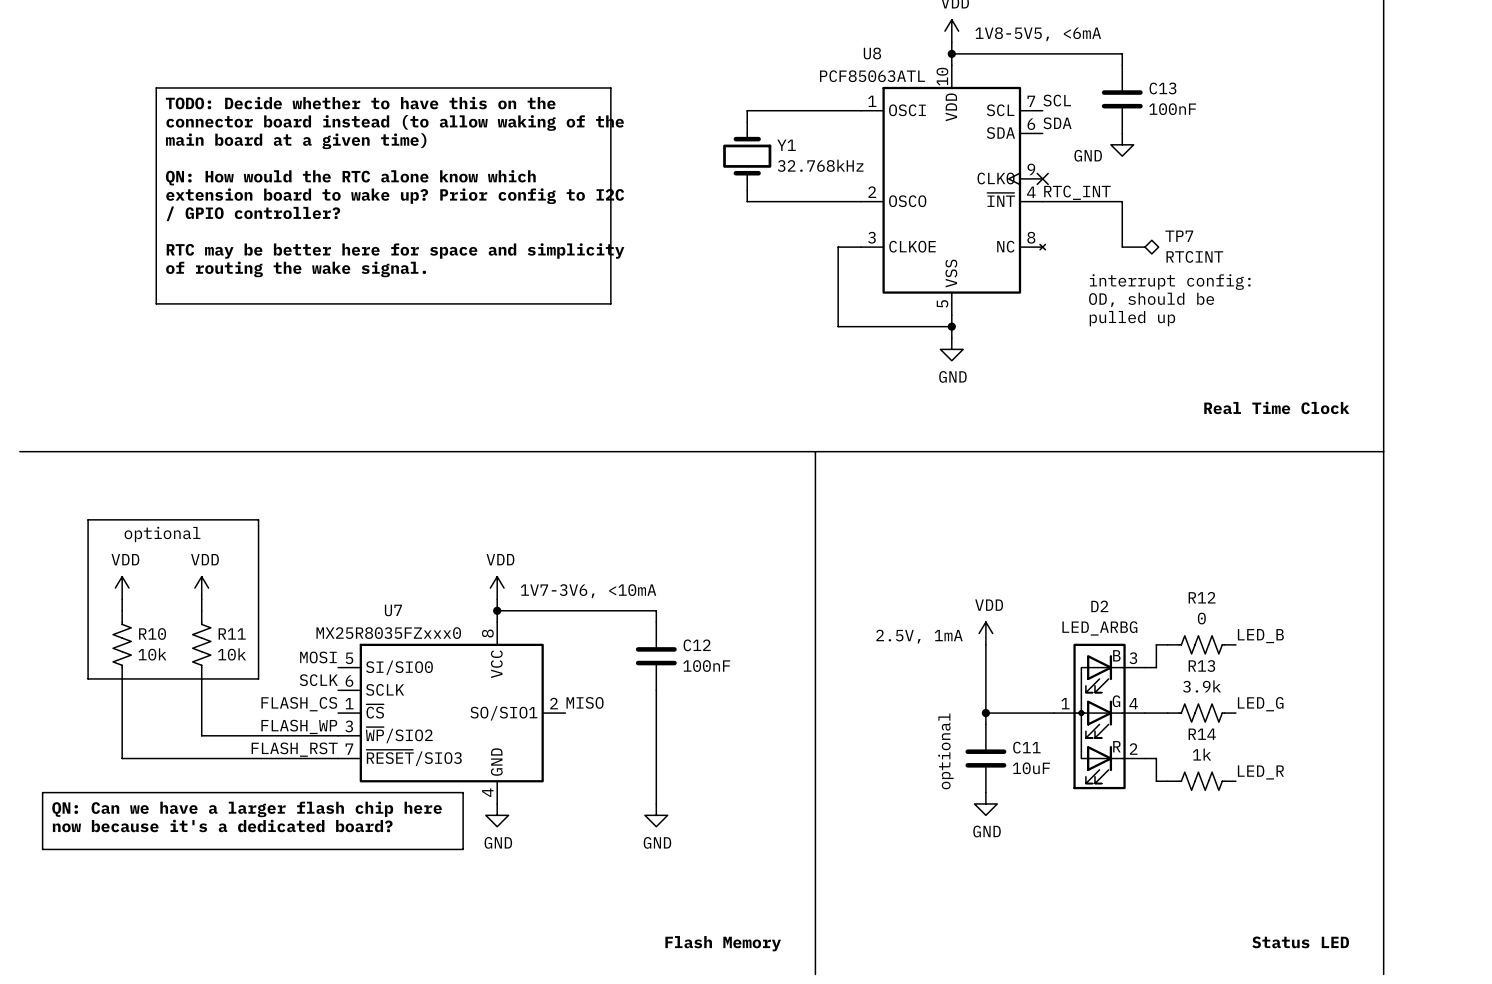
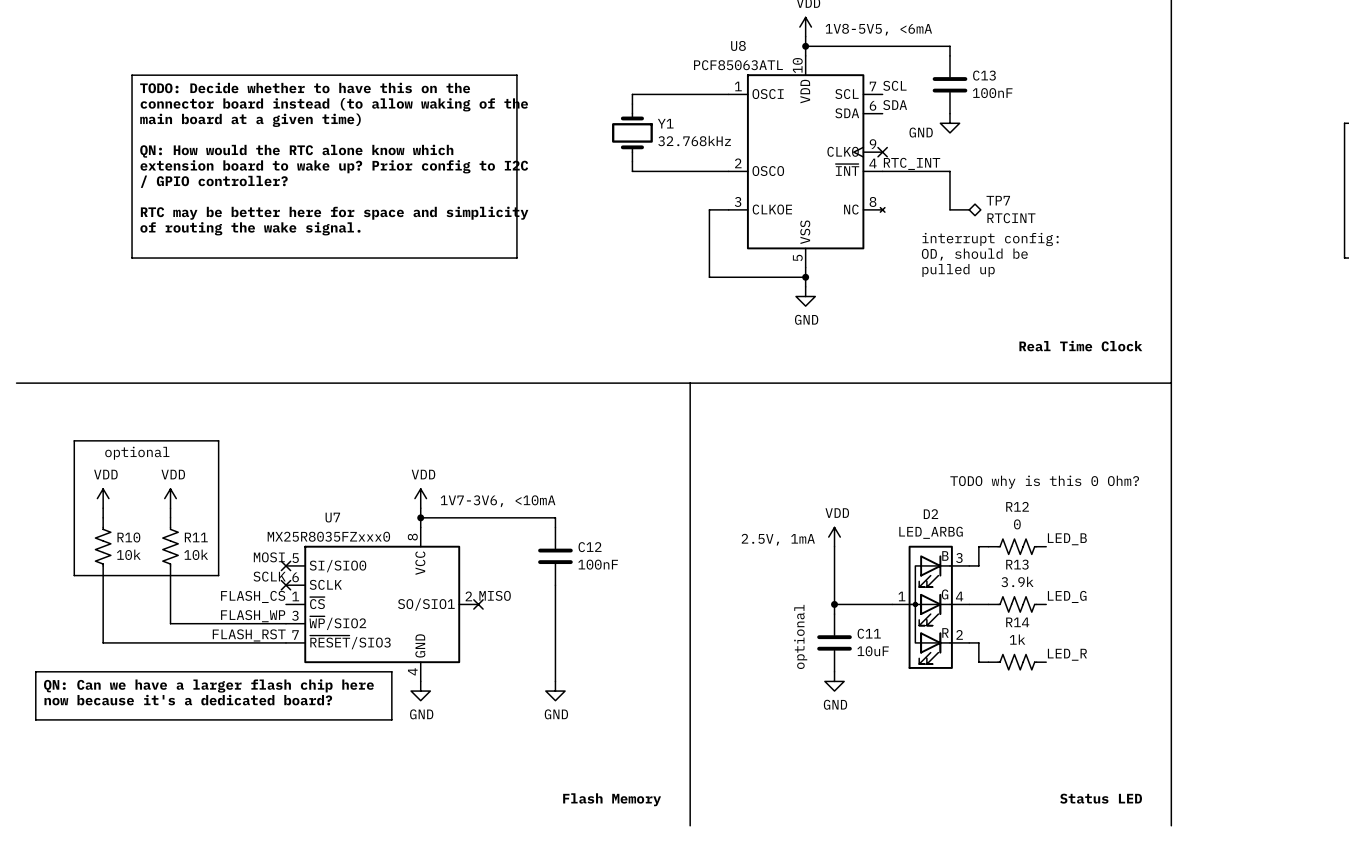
text: none -> TODO why is this 0 Ohm? (1044, 482)
no-connect mark: none -> (285, 565)
no-connect mark: none -> (285, 585)
no-connect mark: none -> (478, 604)

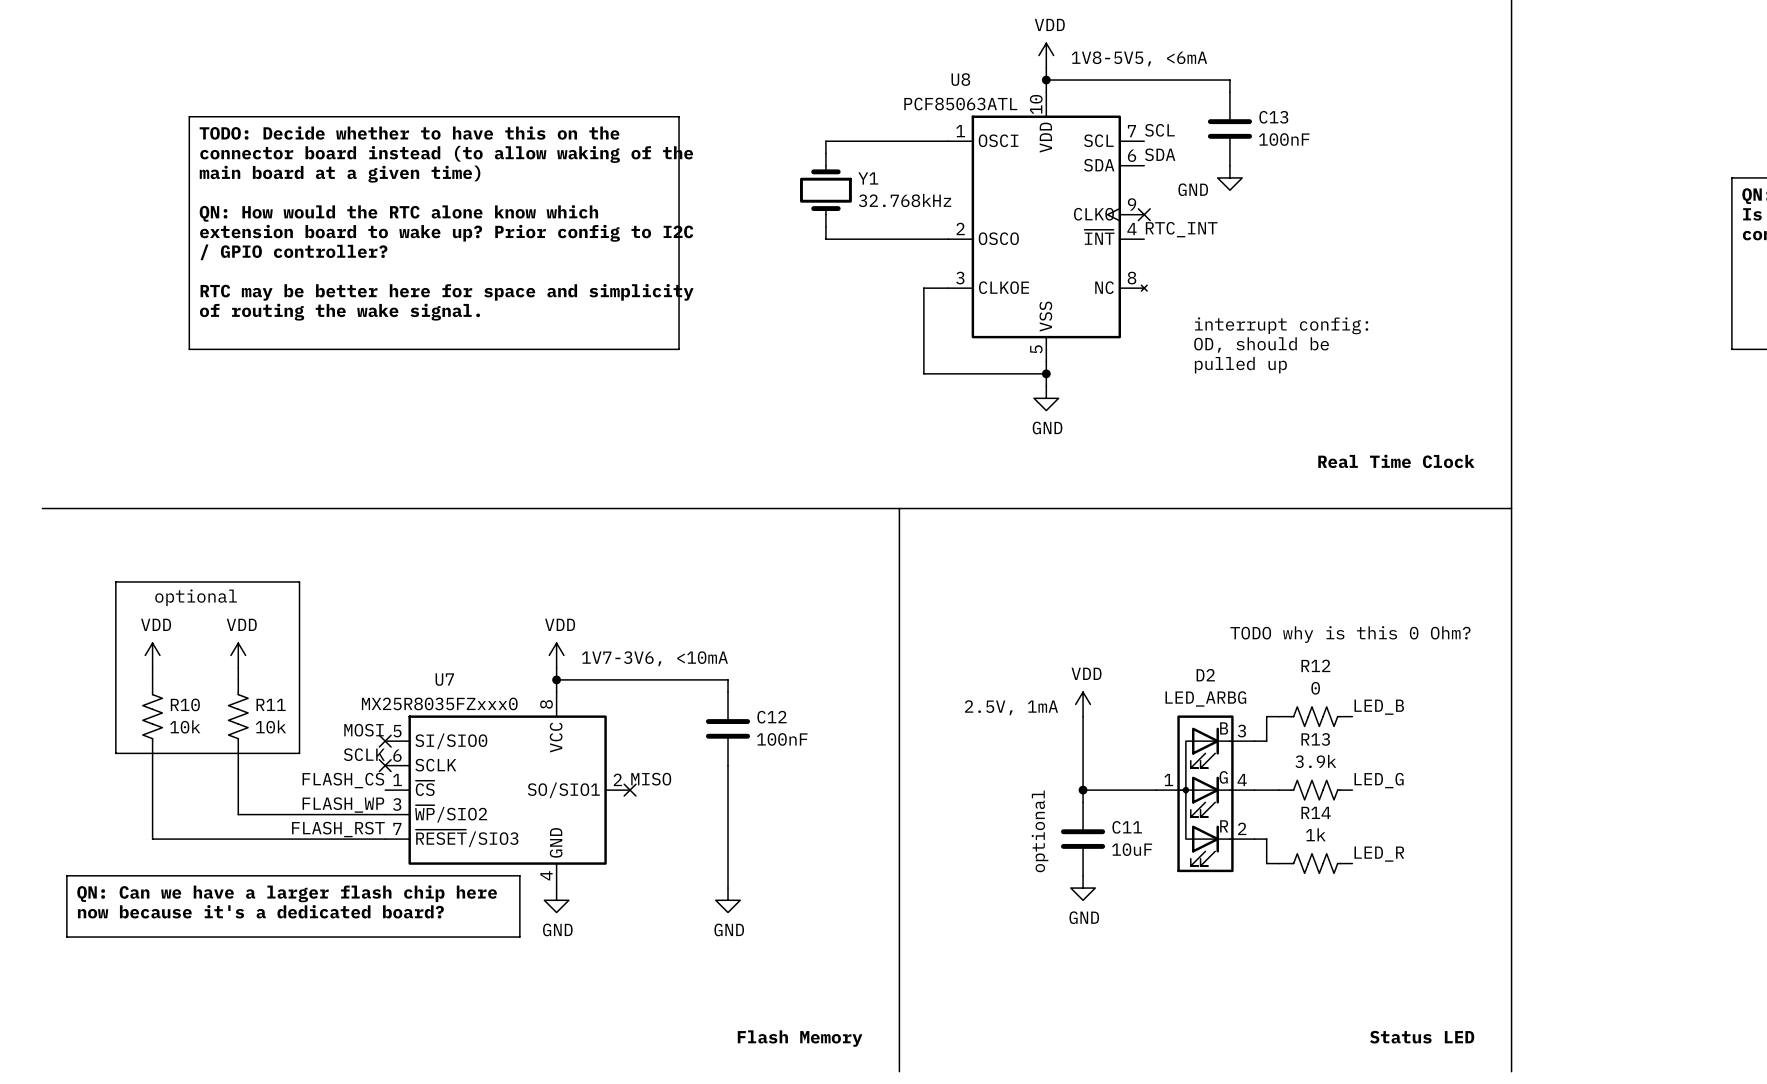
wire: (882, 171) (949, 171) (949, 209) -> none
TP7: RTCINT (965, 209) -> none

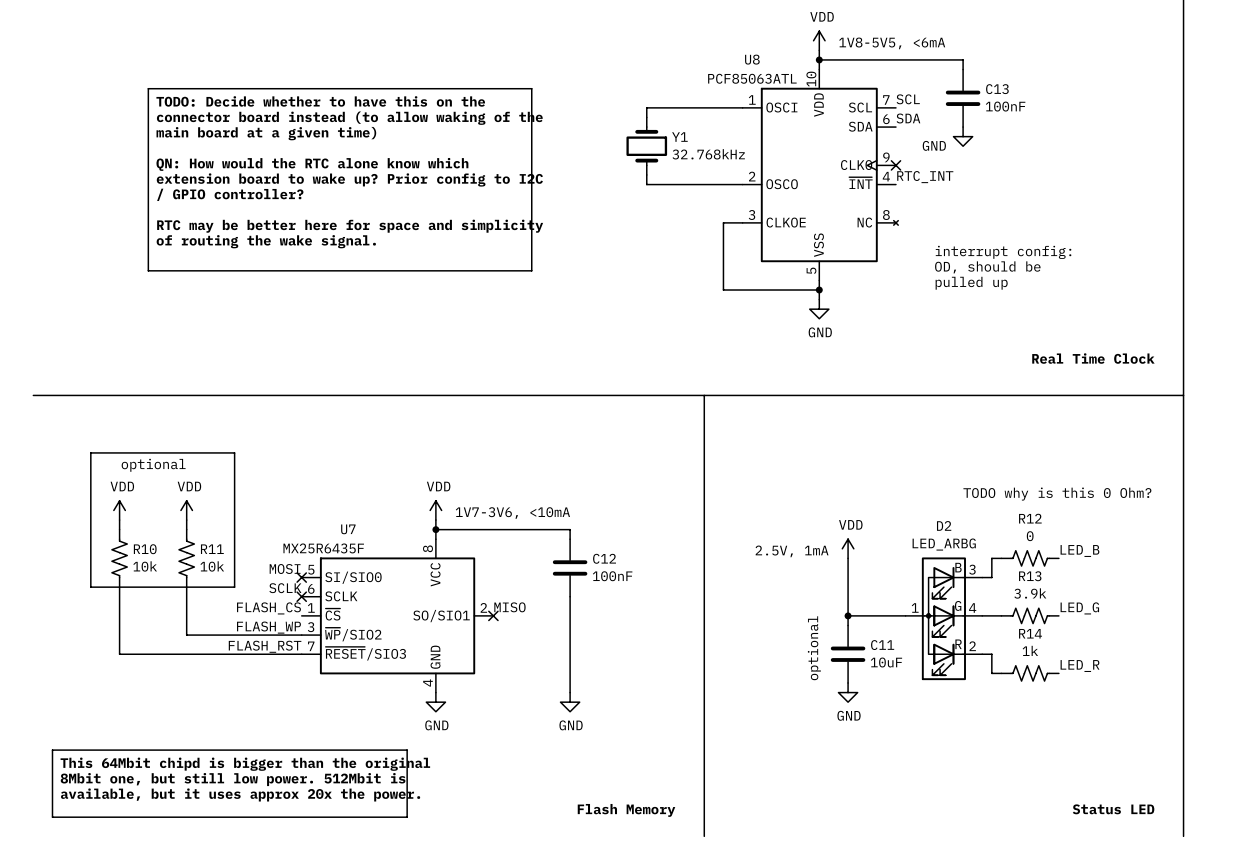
U7 value: MX25R8035FZxxx0 (439, 703) -> MX25R6435F (323, 548)
line: (66, 875) (519, 875) (519, 937) (66, 937) (66, 875) -> none
text: QN: Can we have a larger flash chip here (287, 893) -> none
text: now because it's a dedicated board? (260, 911) -> none
line: none -> (52, 750) (407, 750) (407, 817) (52, 817) (52, 750)
text: none -> This 64Mbit chipd is bigger than the original (245, 764)
text: none -> 8Mbit one, but still low power. 512Mbit is (233, 779)
text: none -> available, but it uses approx 20x the power. (240, 794)

